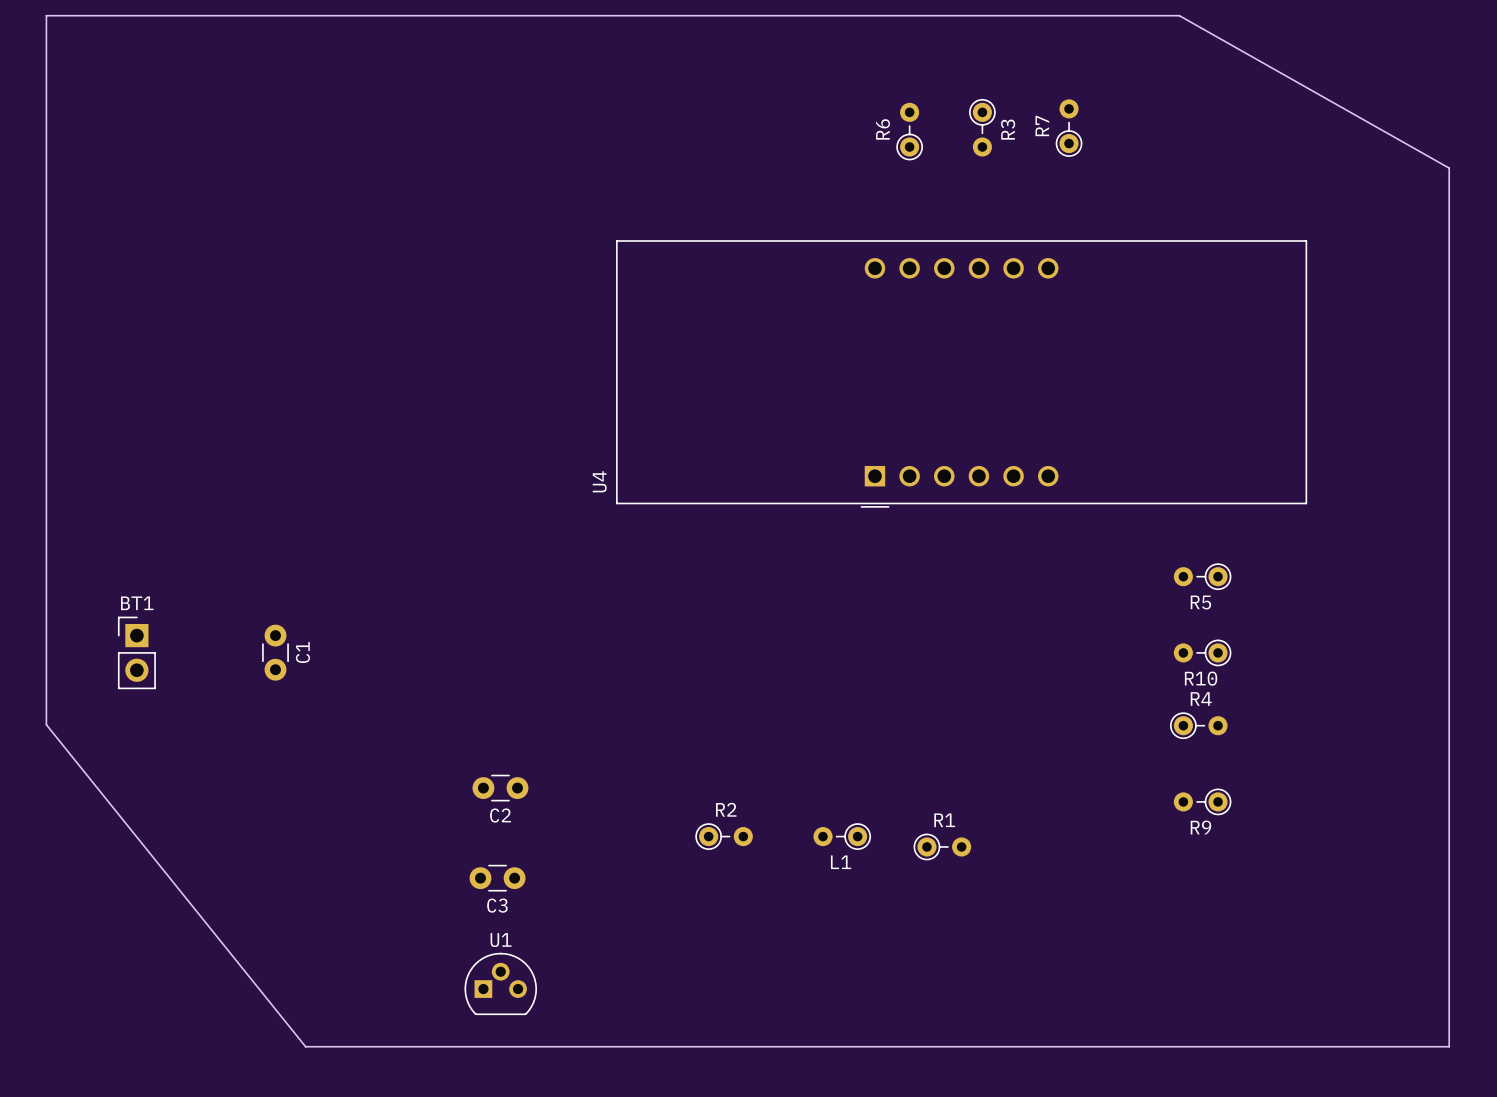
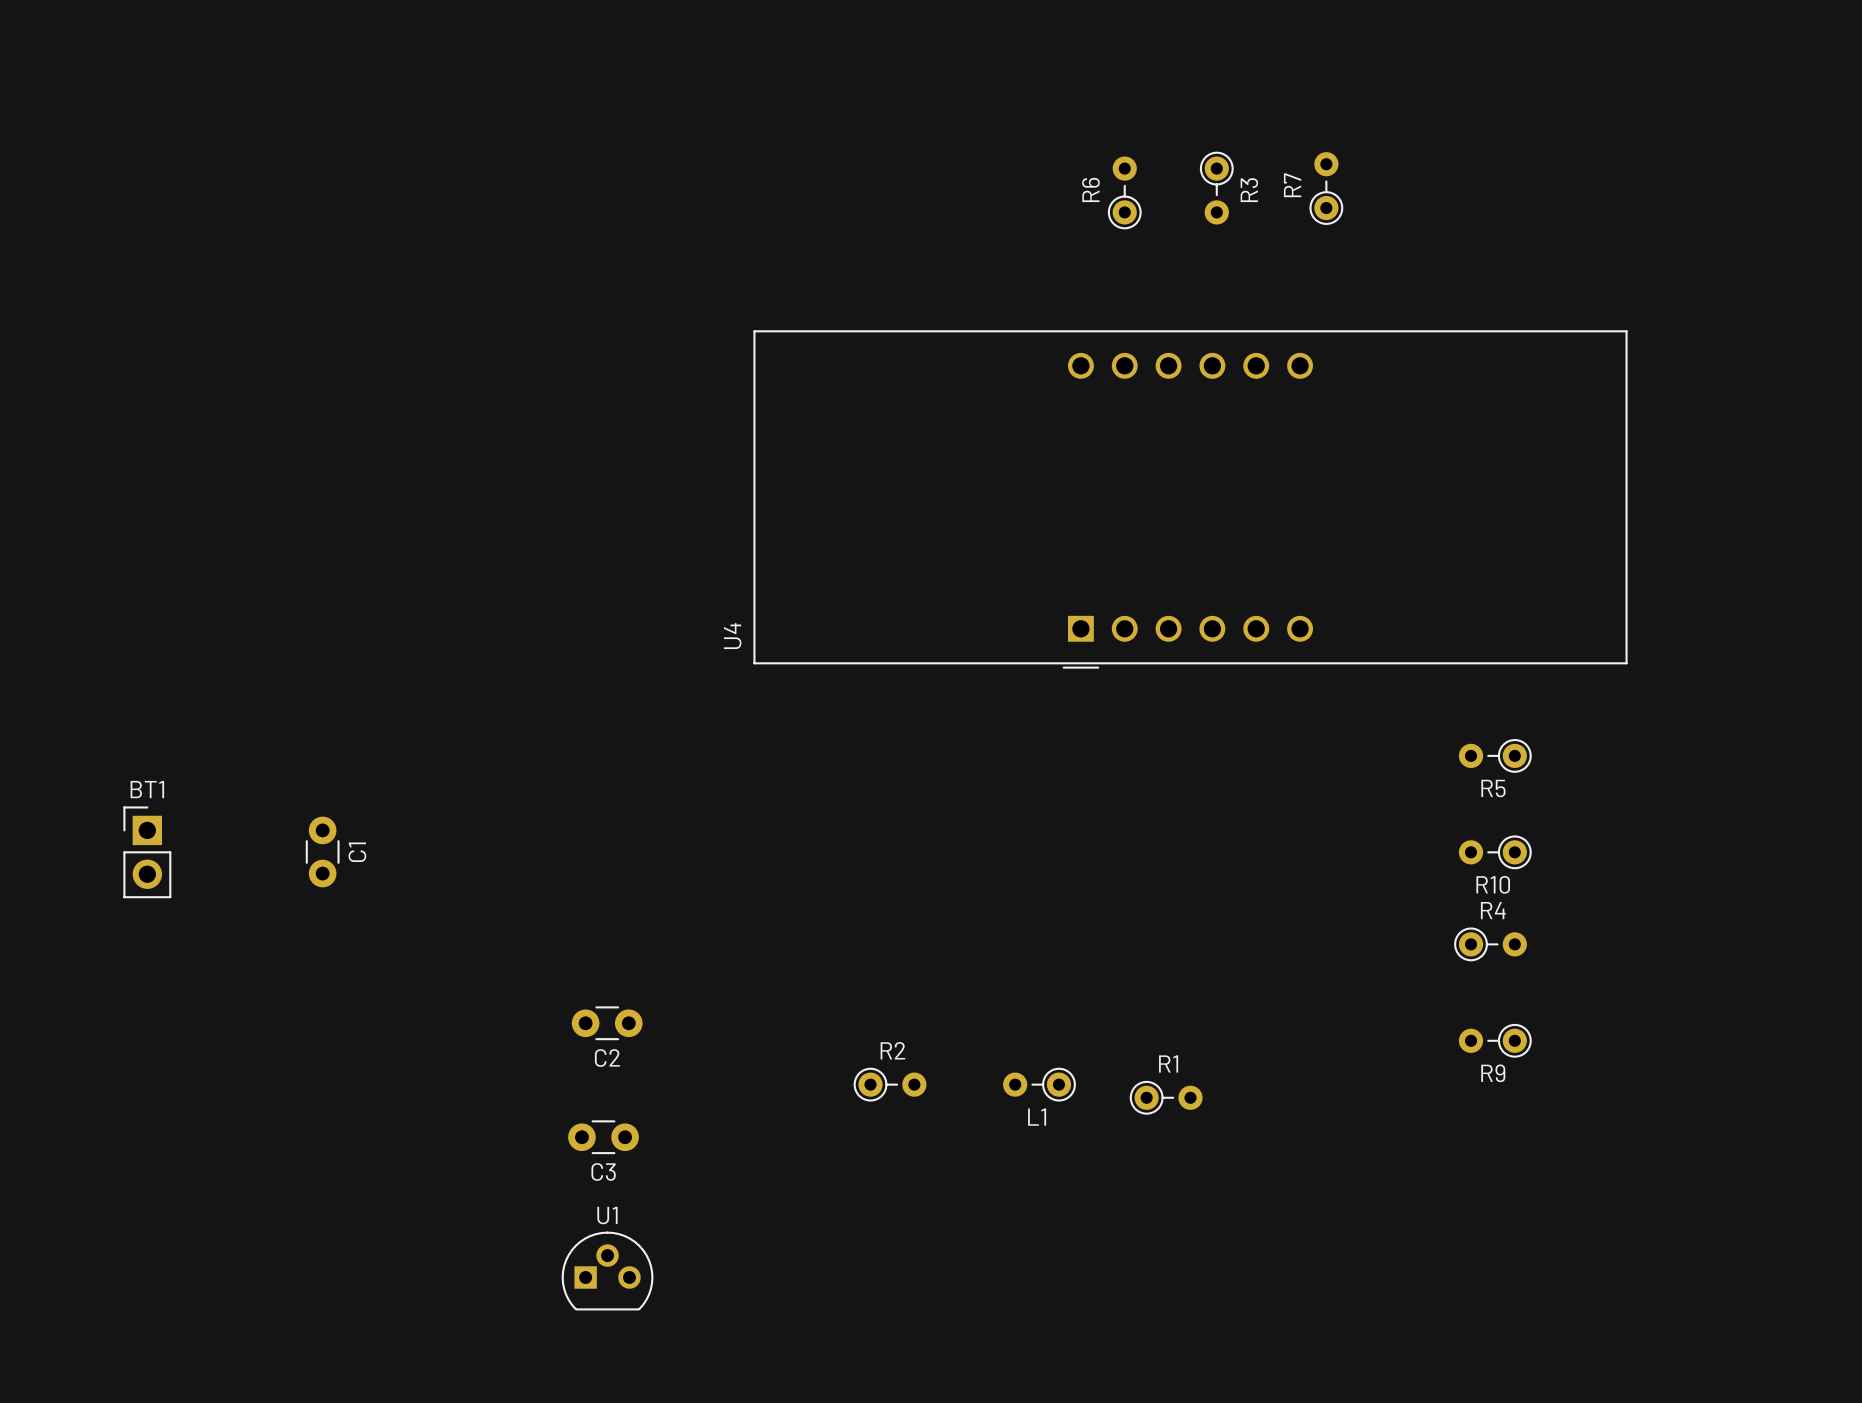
board edge: (46, 15) (1179, 15) (1449, 168) (1449, 1046) (305, 1046) (46, 724) (46, 15) -> none

